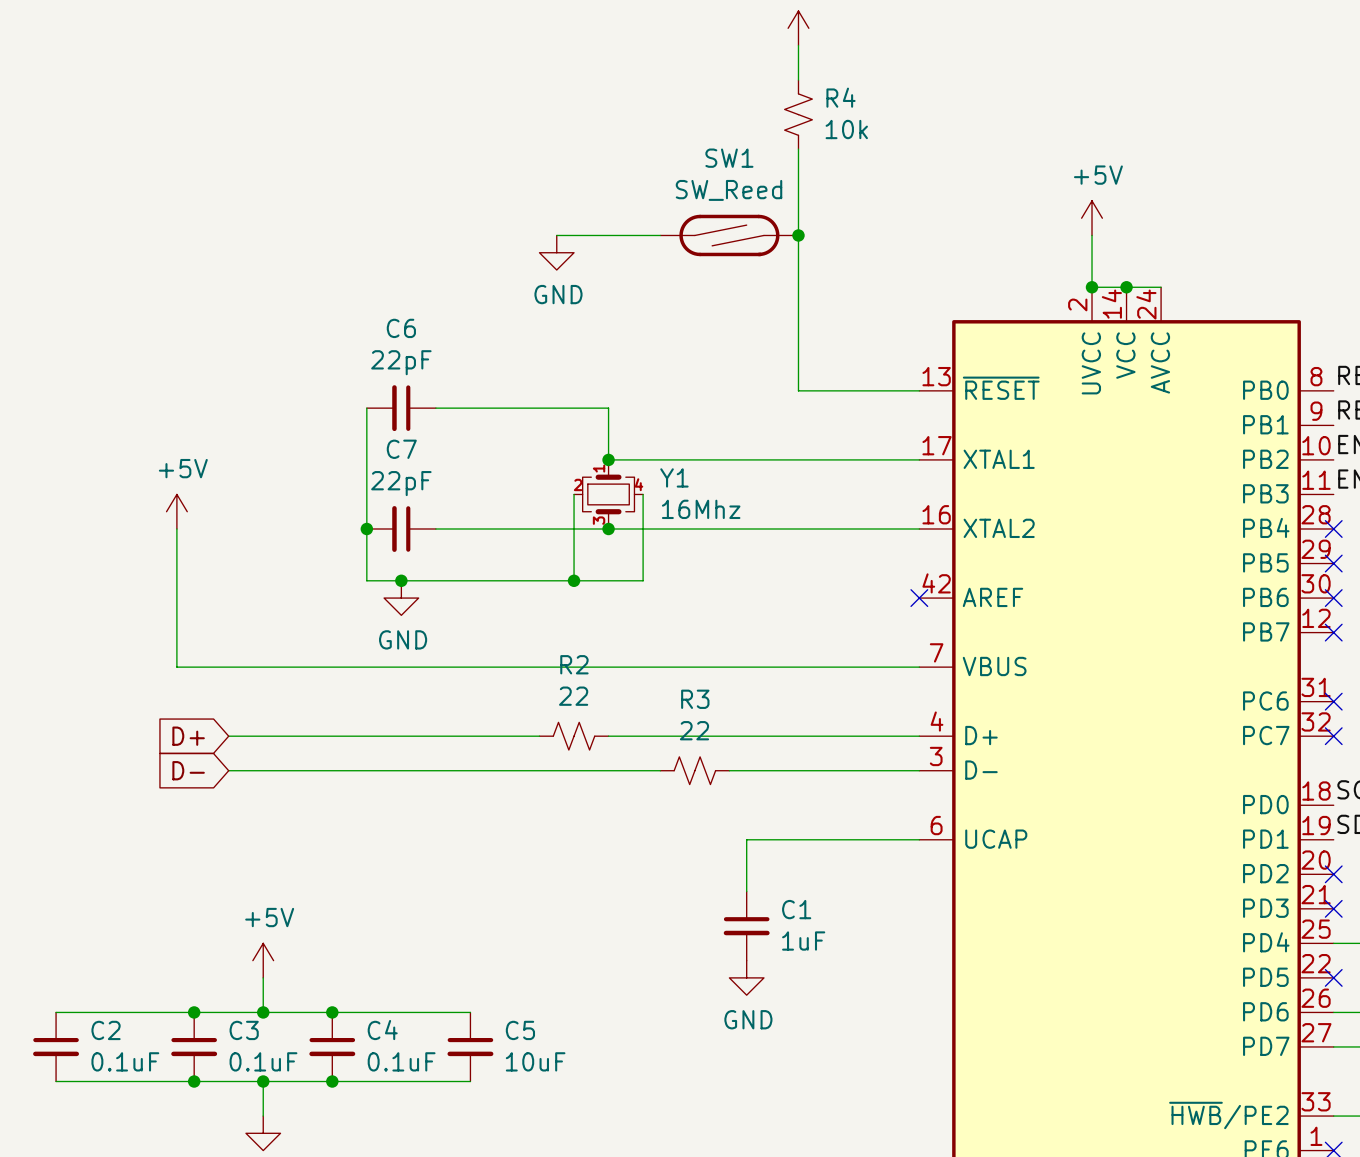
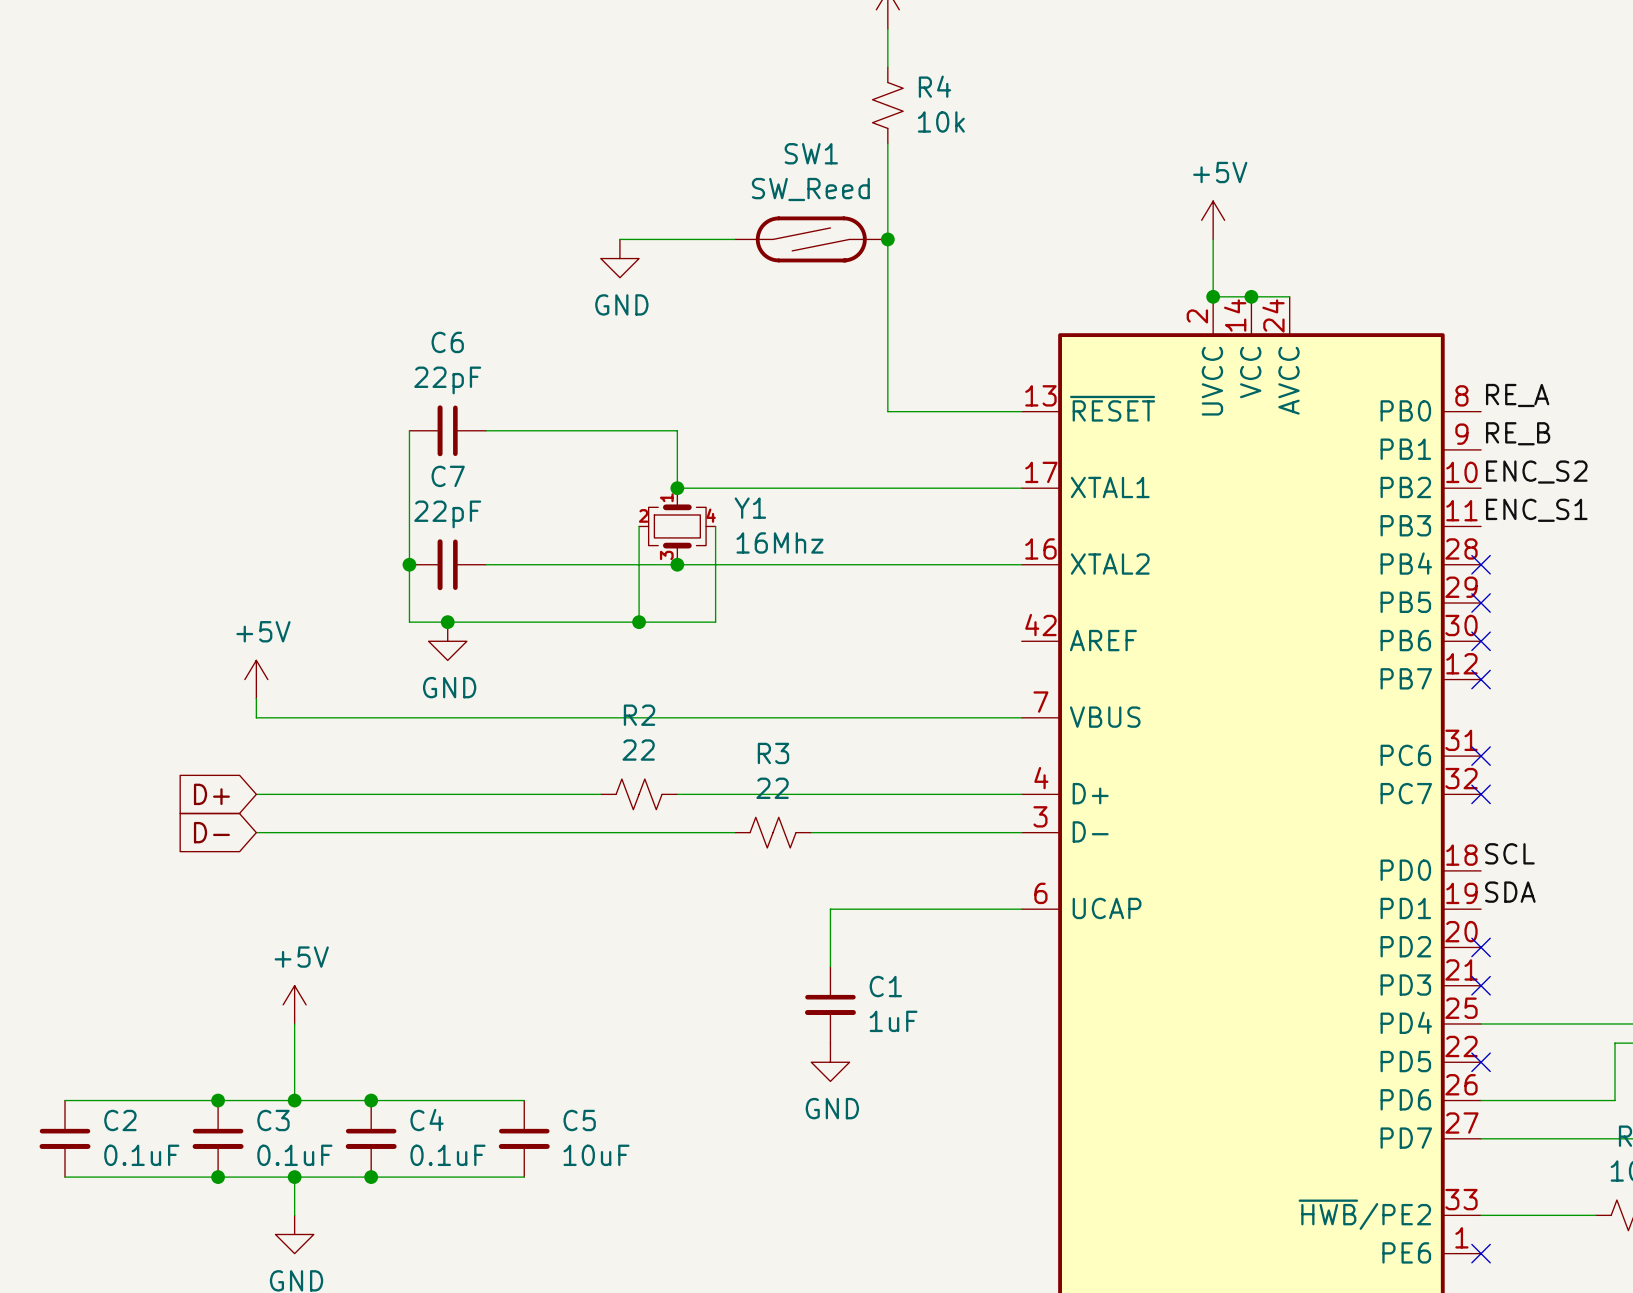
power symbol position: +5V (176, 511) -> +5V (256, 679)
wire: (176, 528) (176, 667) (228, 667) -> (256, 698) (256, 717)
no-connect mark: (919, 598) -> none
power symbol position: +5V (263, 960) -> +5V (294, 1004)

